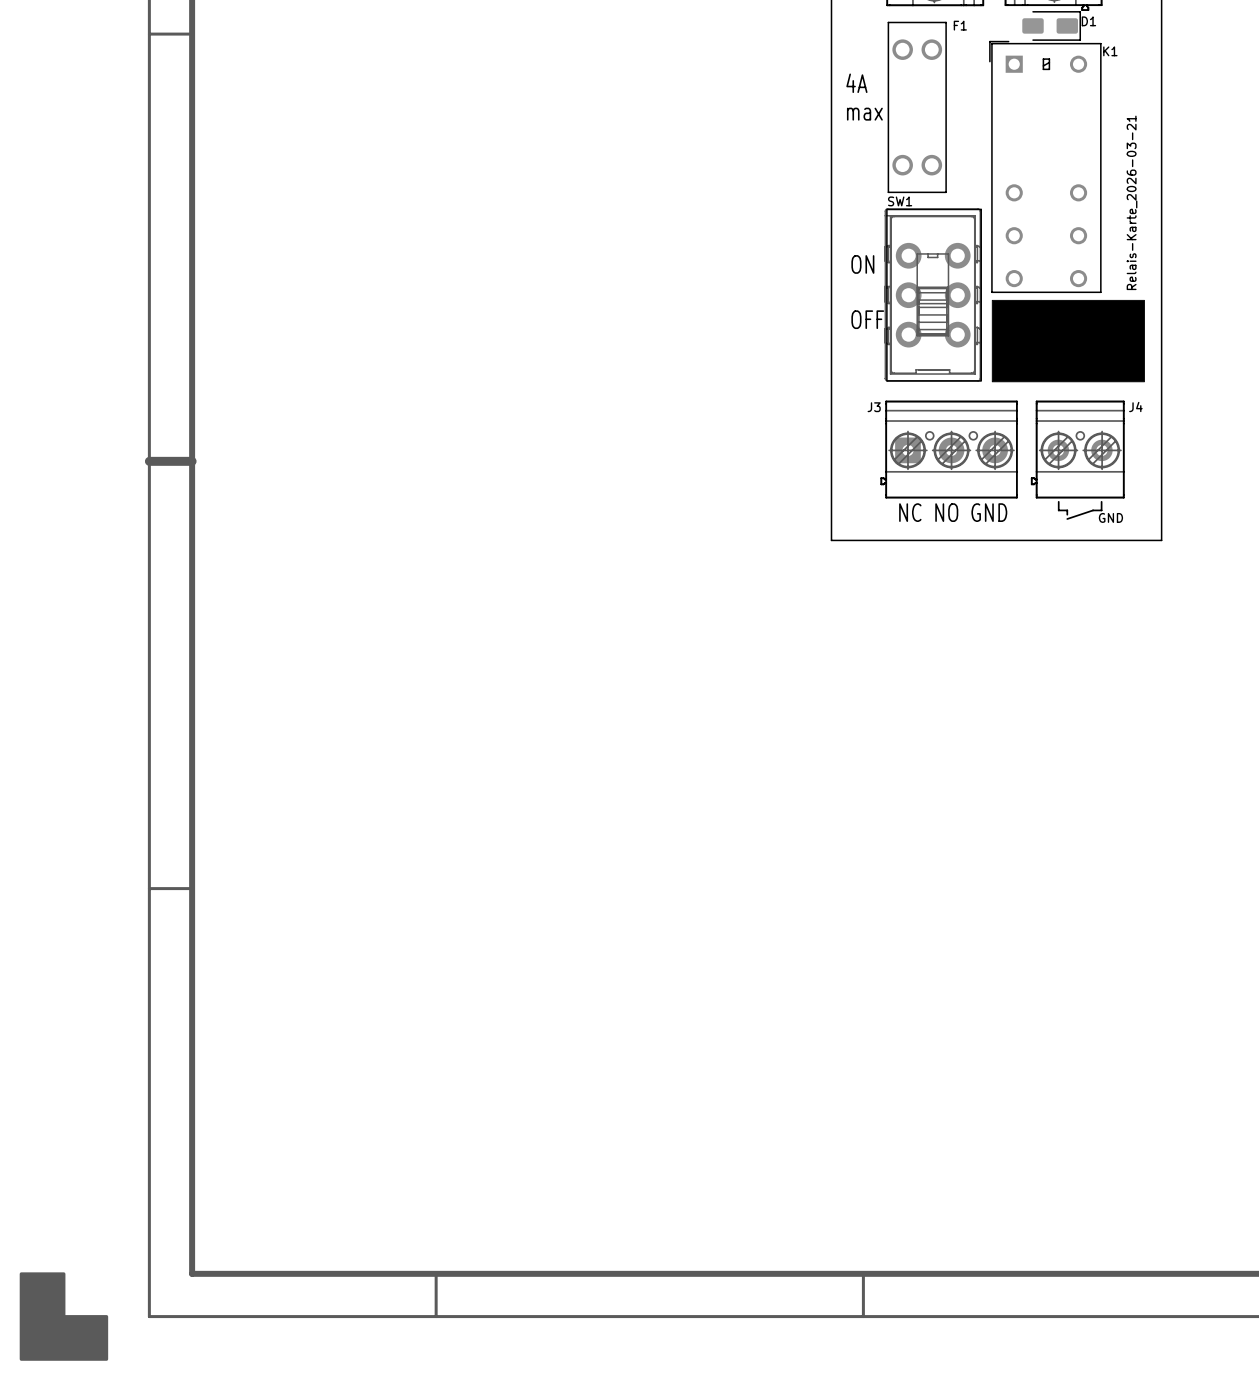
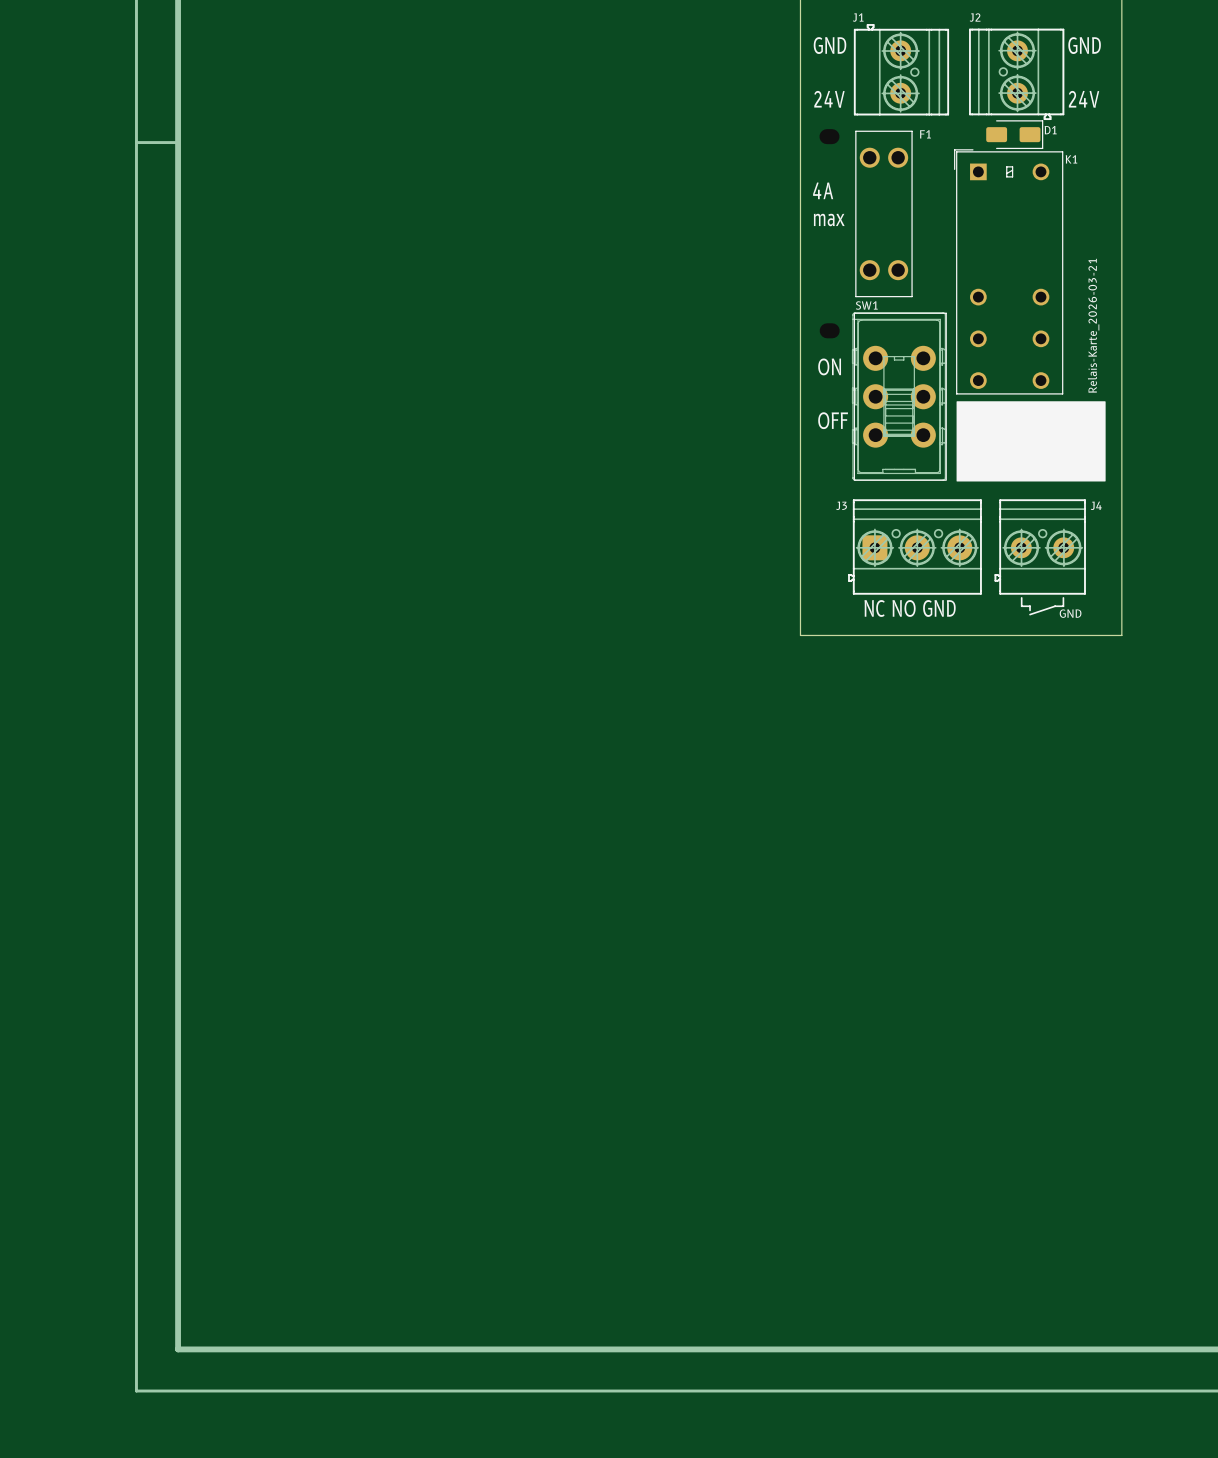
line: (149, 461) (192, 461) (149, 461) -> none
line: (149, 888) (192, 888) -> none
drawing: [19, 1272, 109, 1361] -> none
line: (436, 1273) (436, 1316) -> none
line: (863, 1273) (863, 1316) -> none

